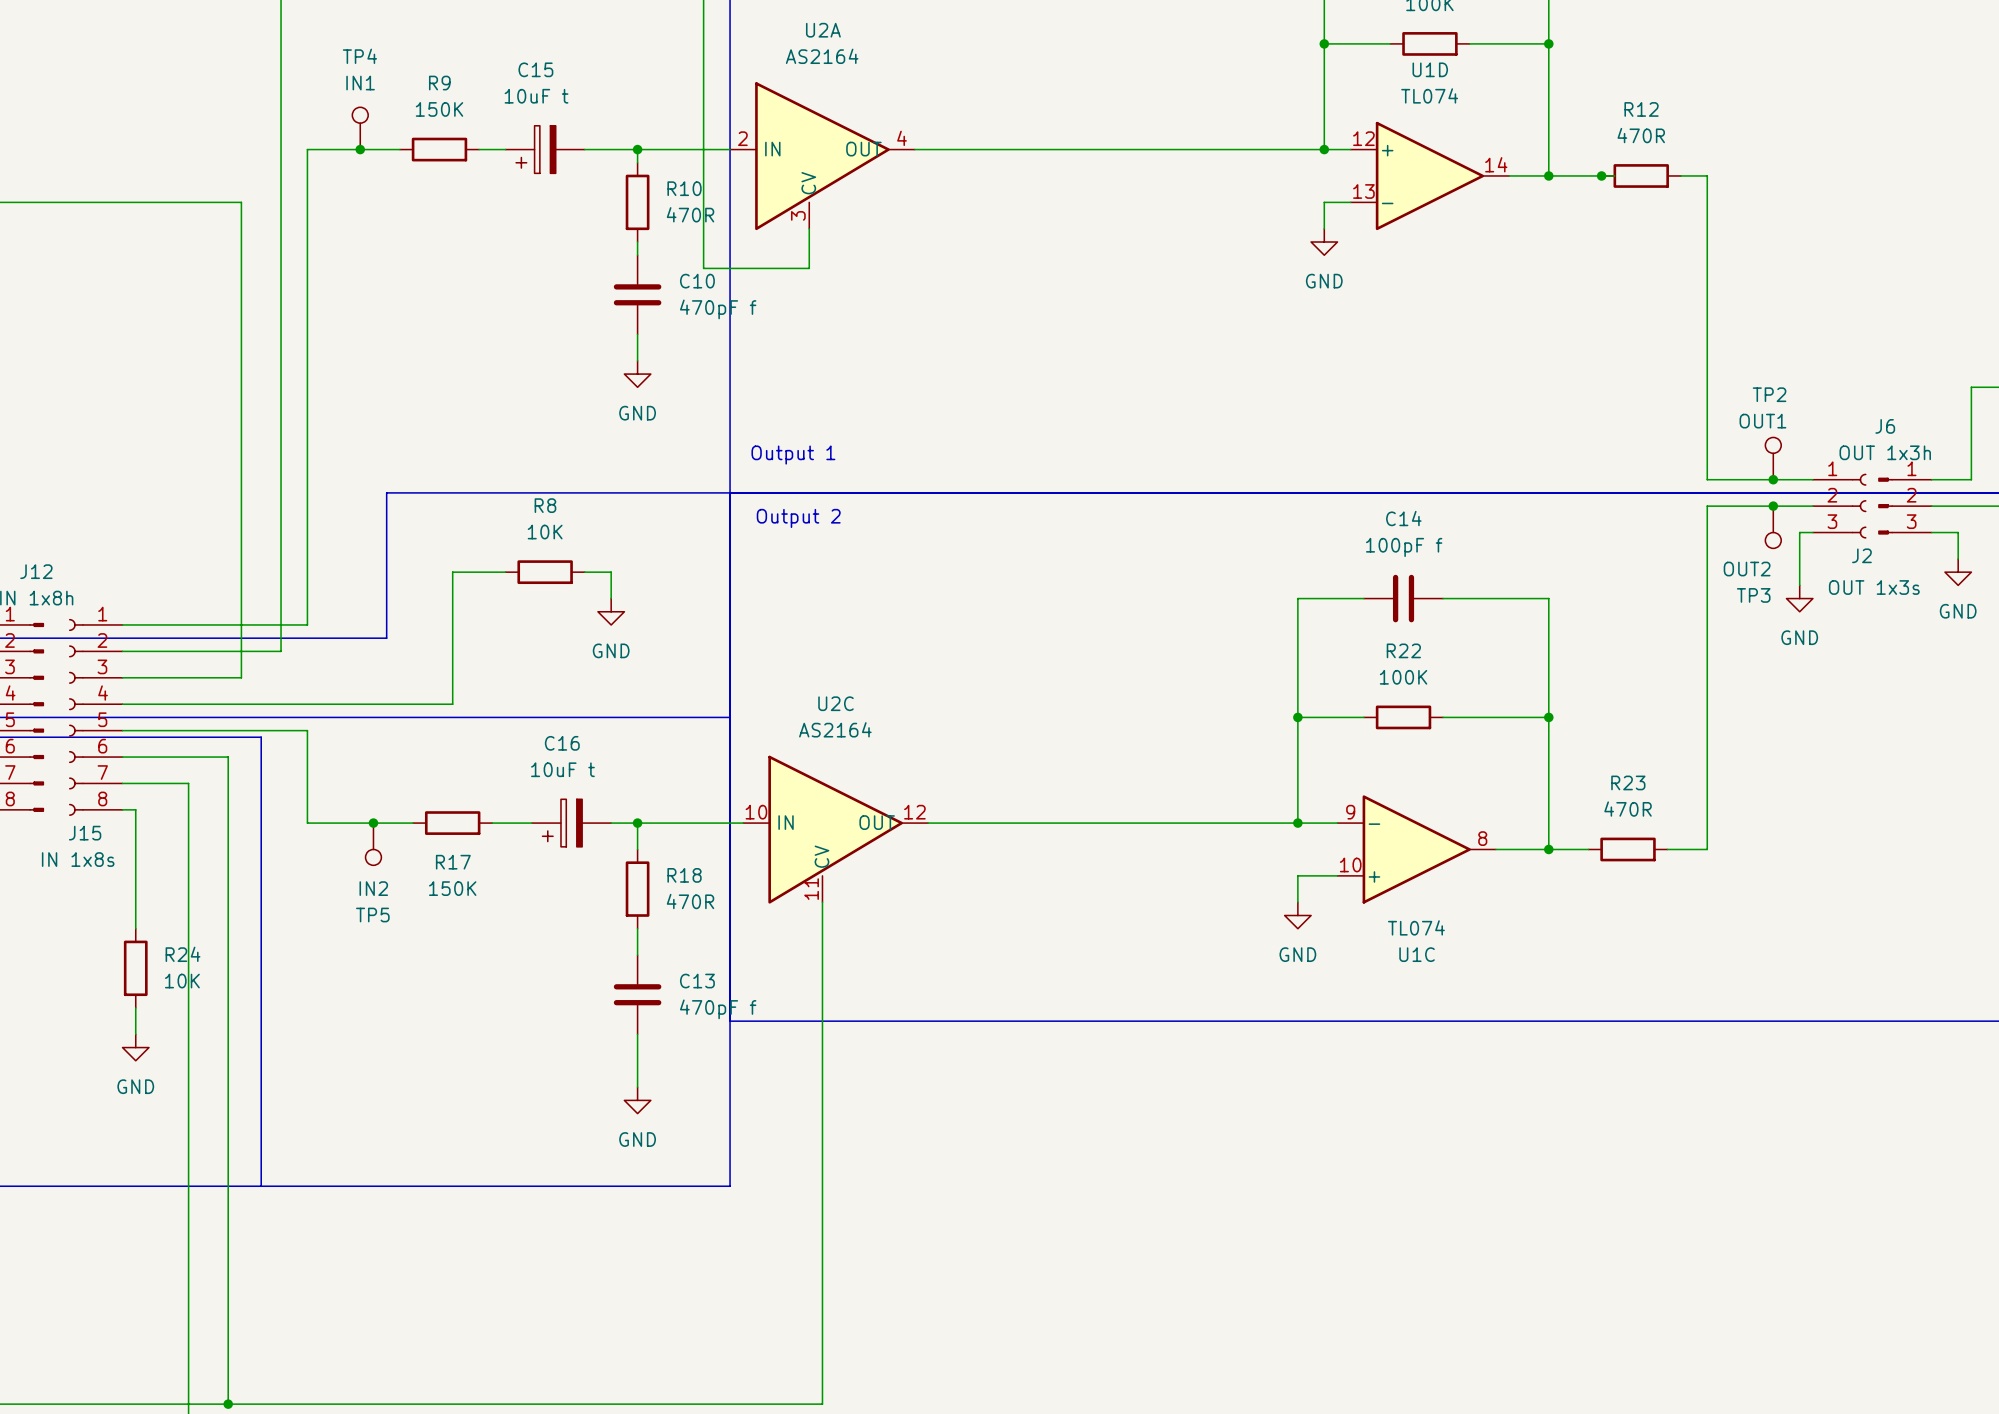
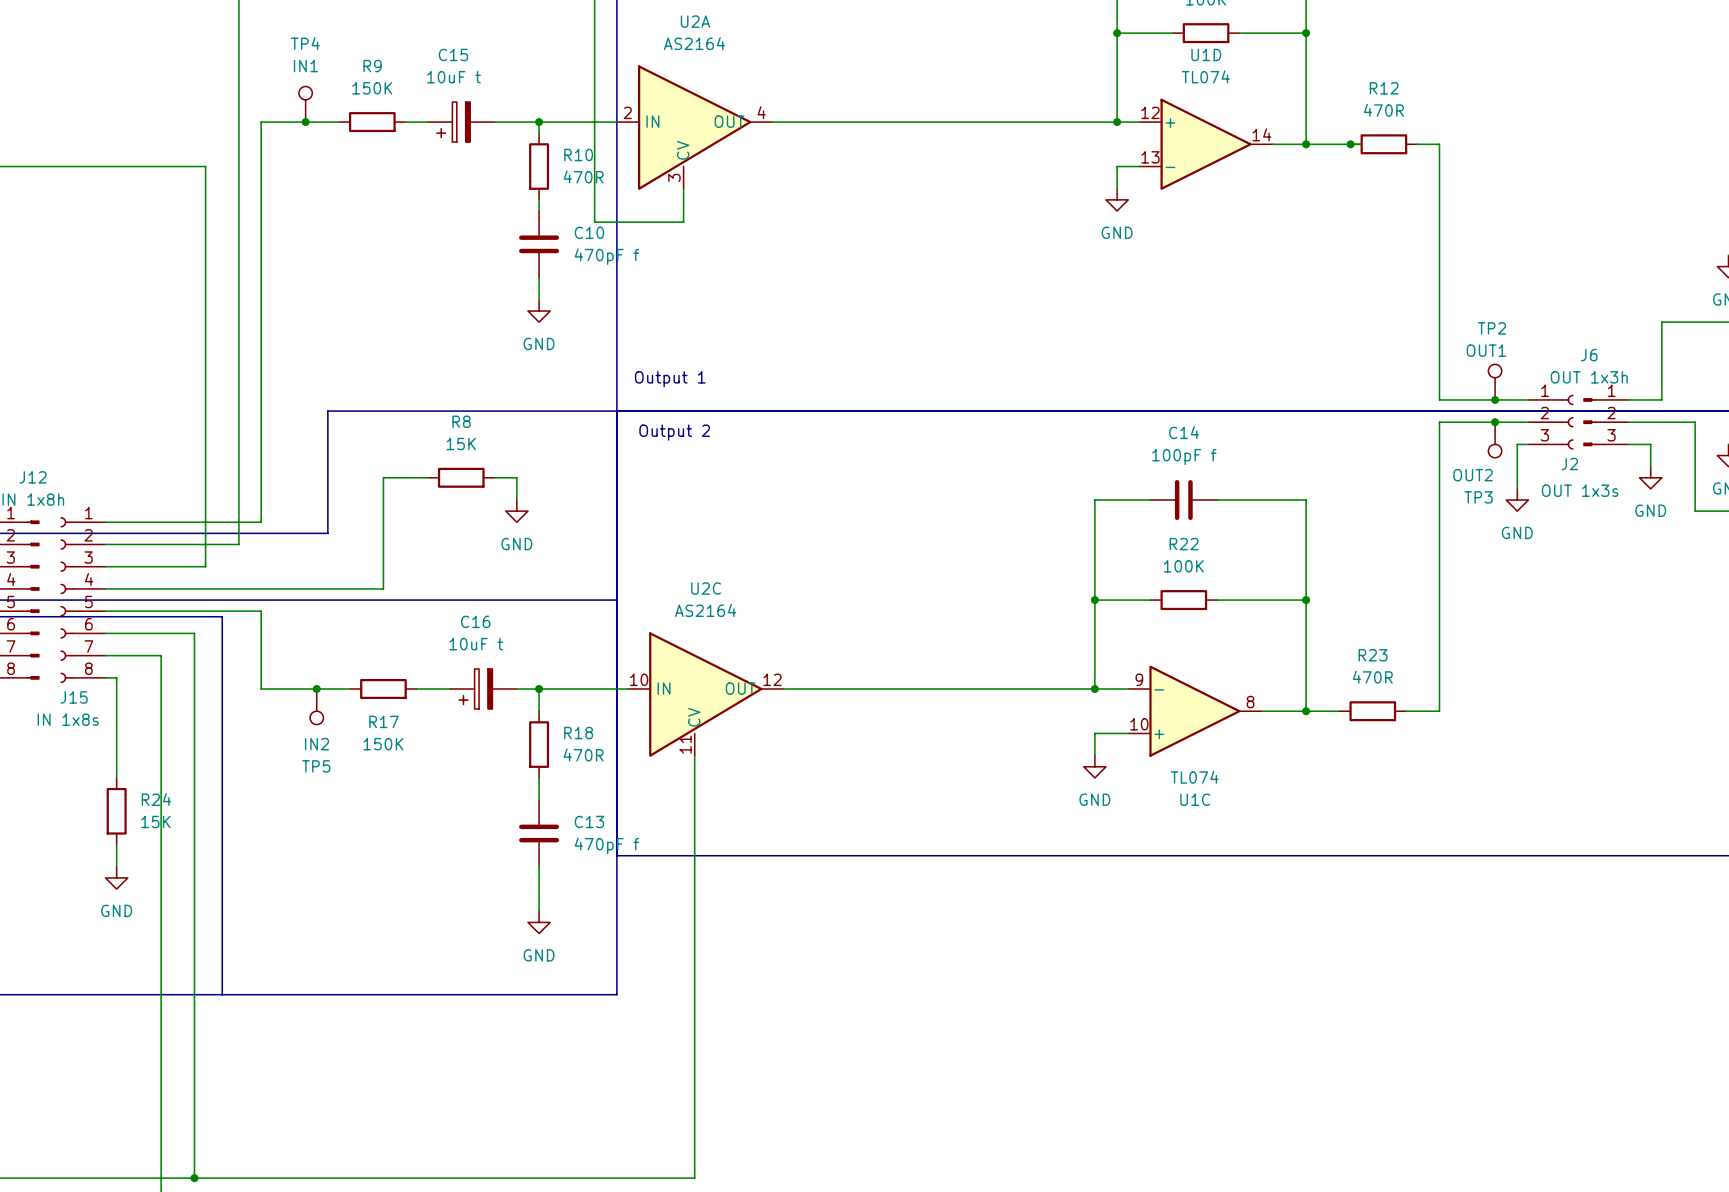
R8 value: 10K (545, 532) -> 15K (461, 444)
R24 value: 10K (182, 981) -> 15K (155, 821)

